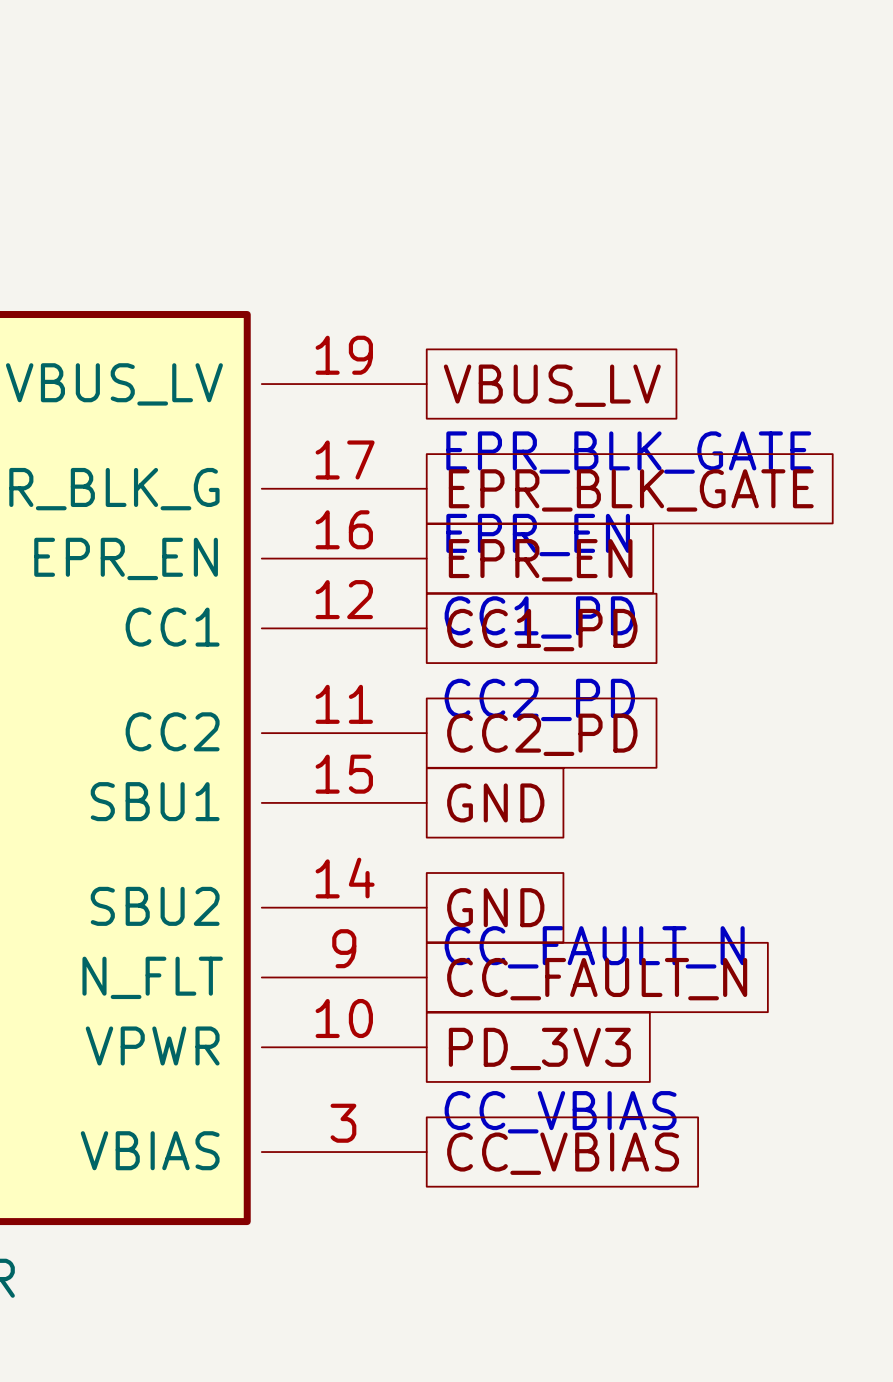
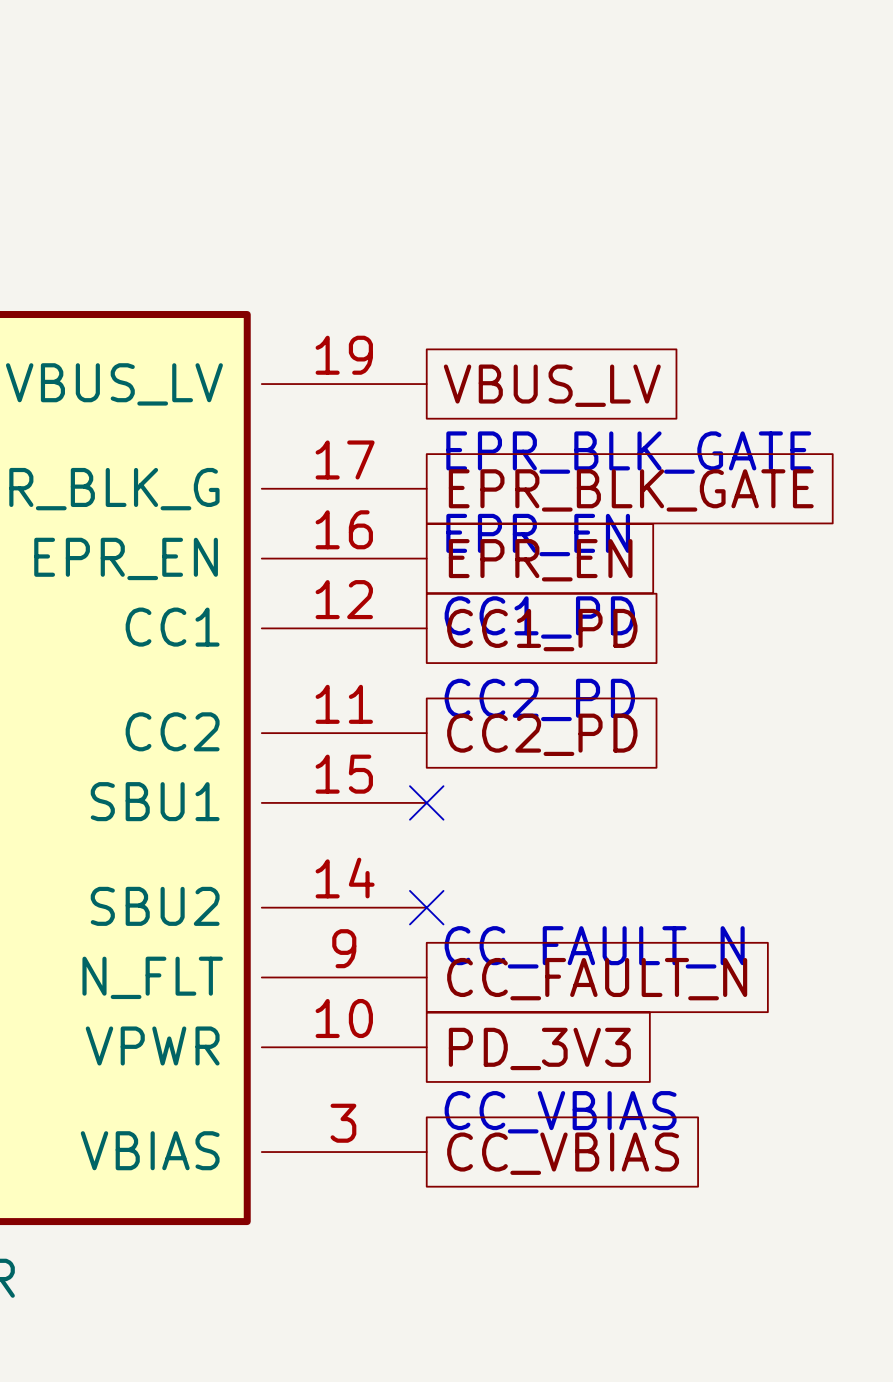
no-connect mark: none -> (426, 802)
global label: GND (495, 802) -> none
no-connect mark: none -> (426, 907)
global label: GND (495, 907) -> none

